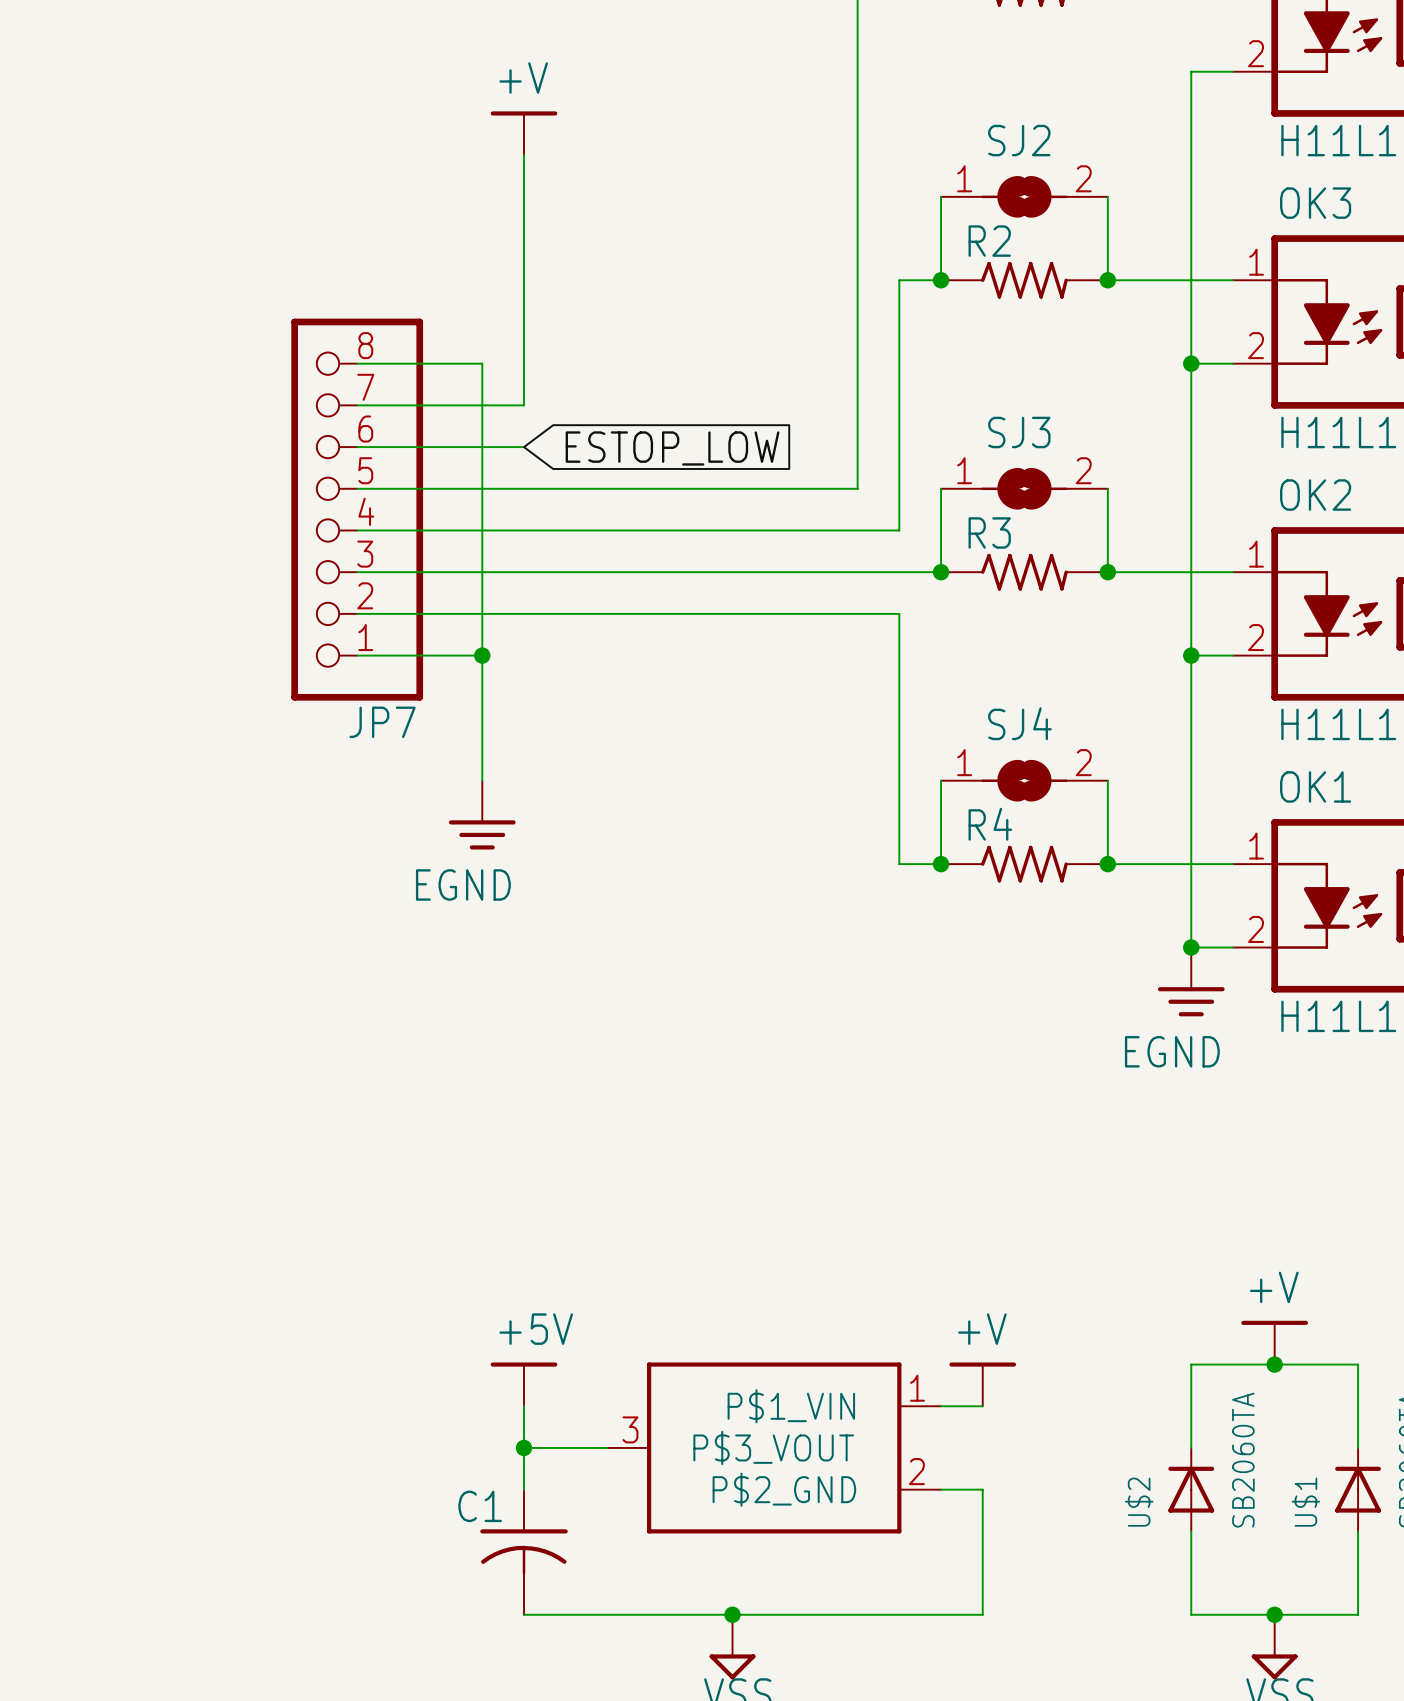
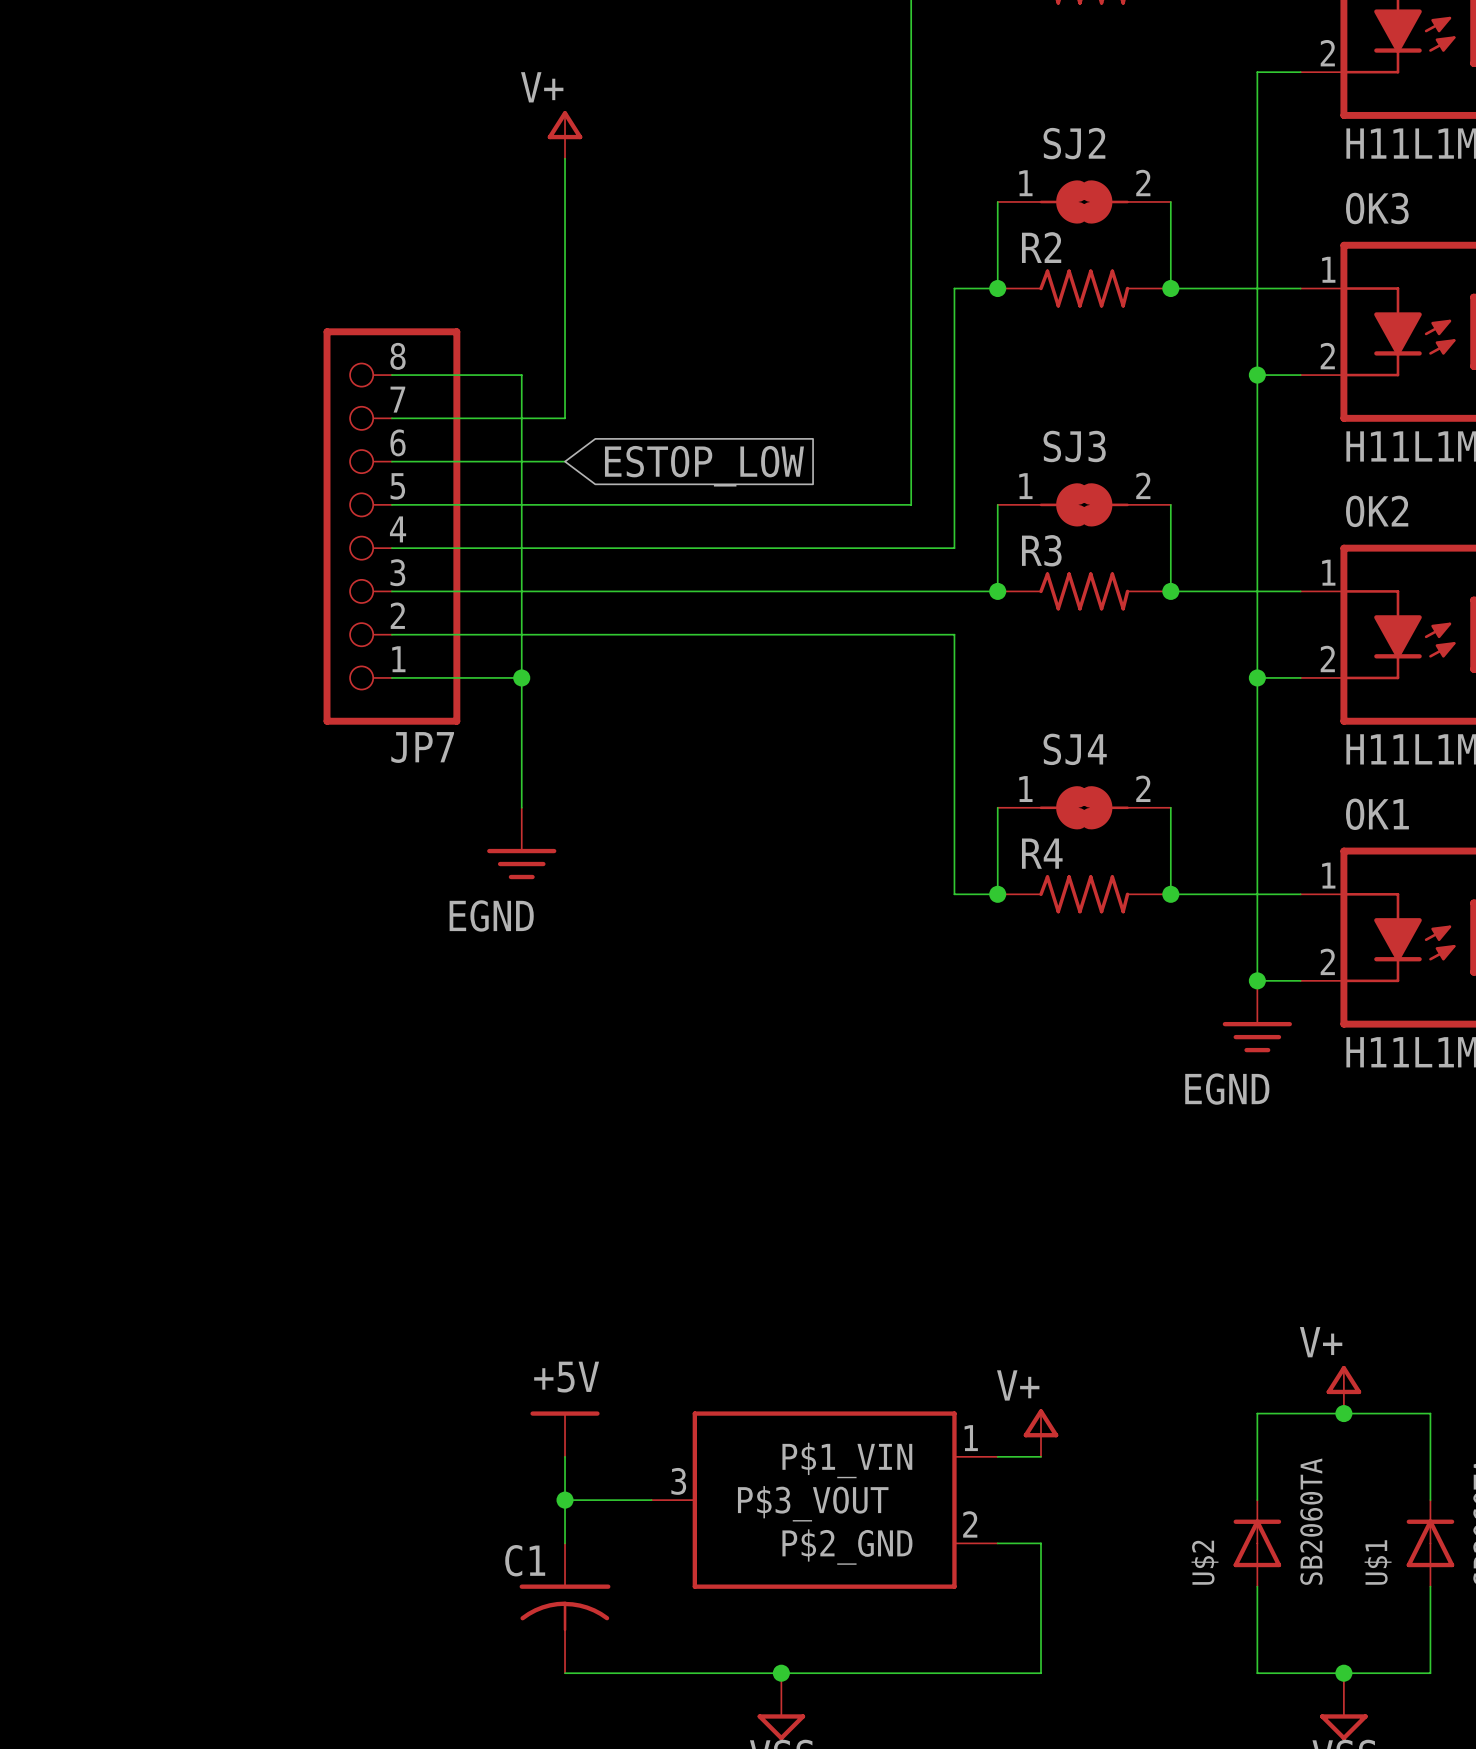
power symbol: +V (524, 133) -> V+ (565, 134)
power symbol: +V (1274, 1342) -> V+ (1343, 1389)
power symbol: +V (982, 1384) -> V+ (1041, 1433)

